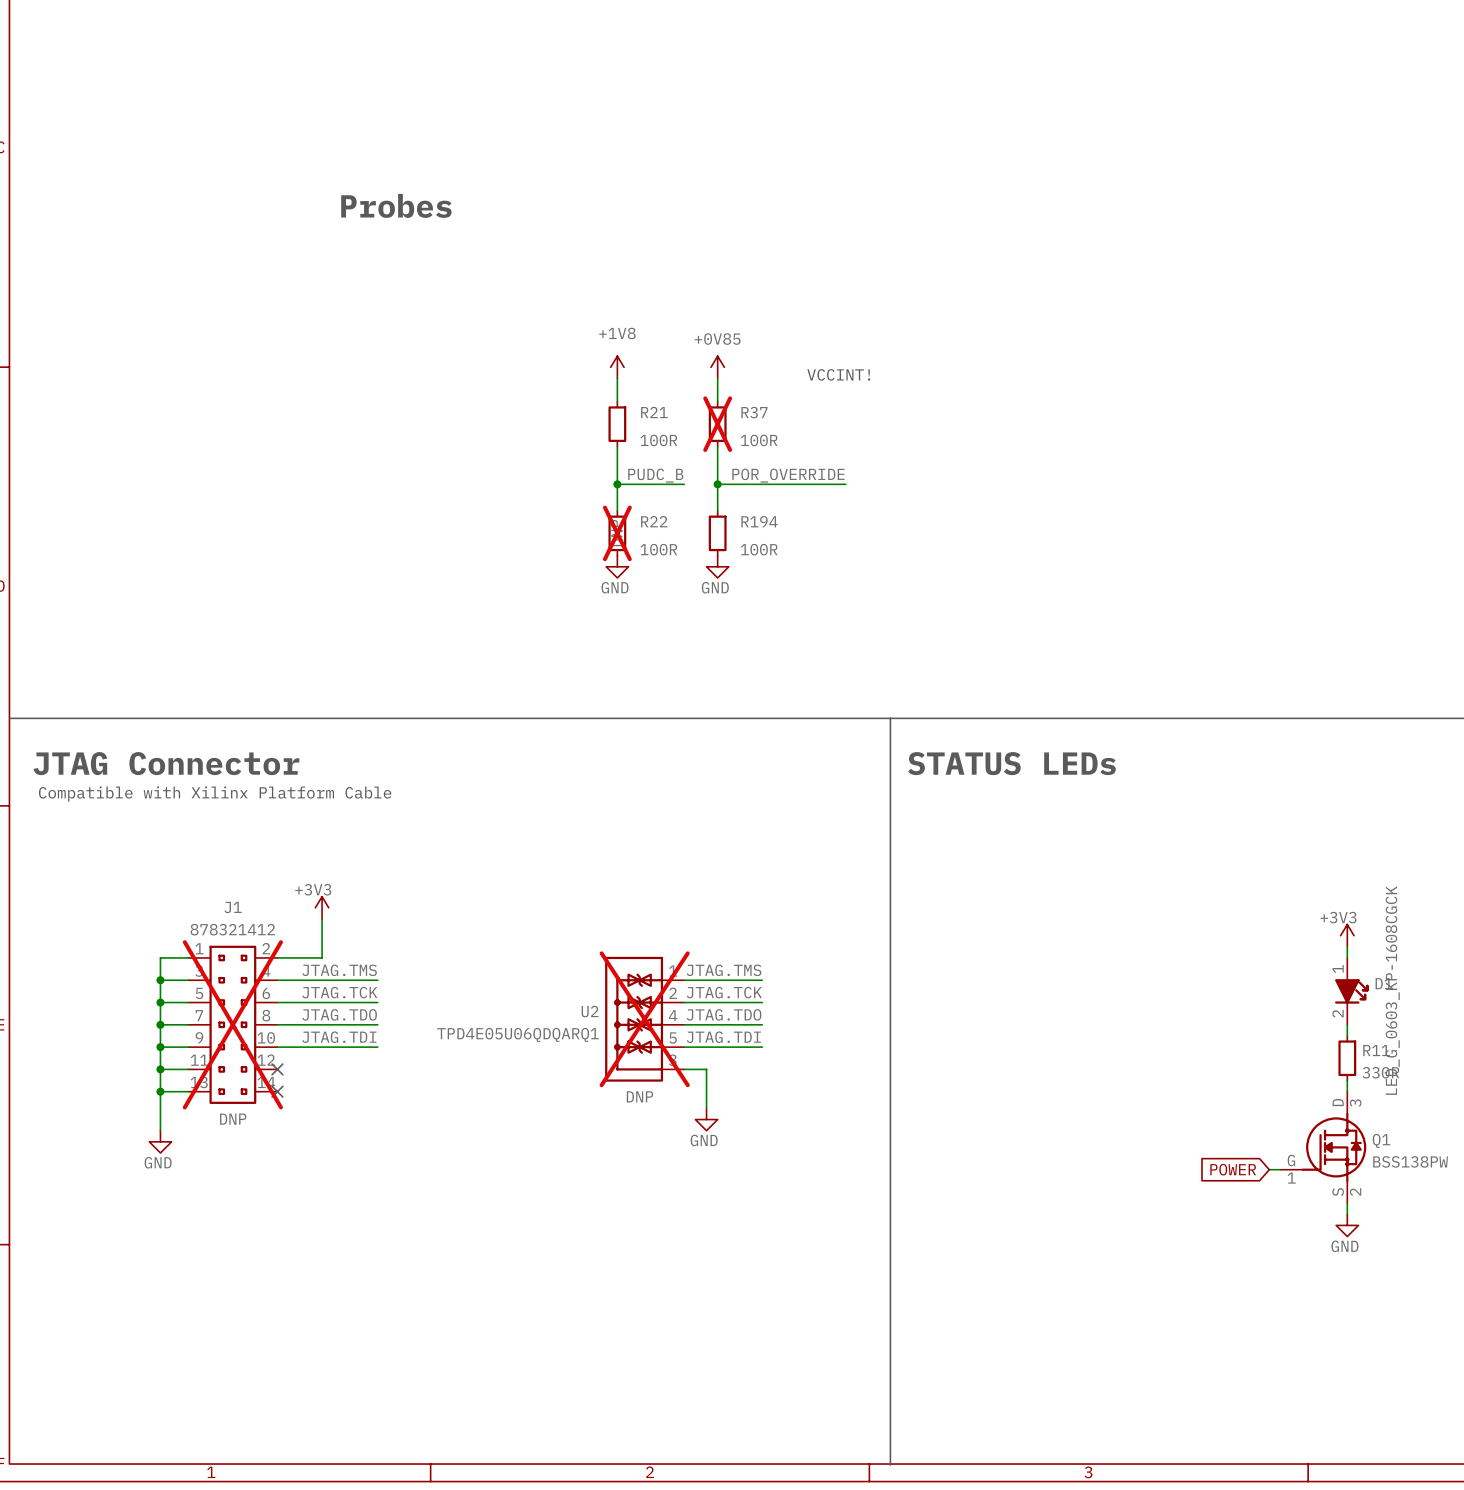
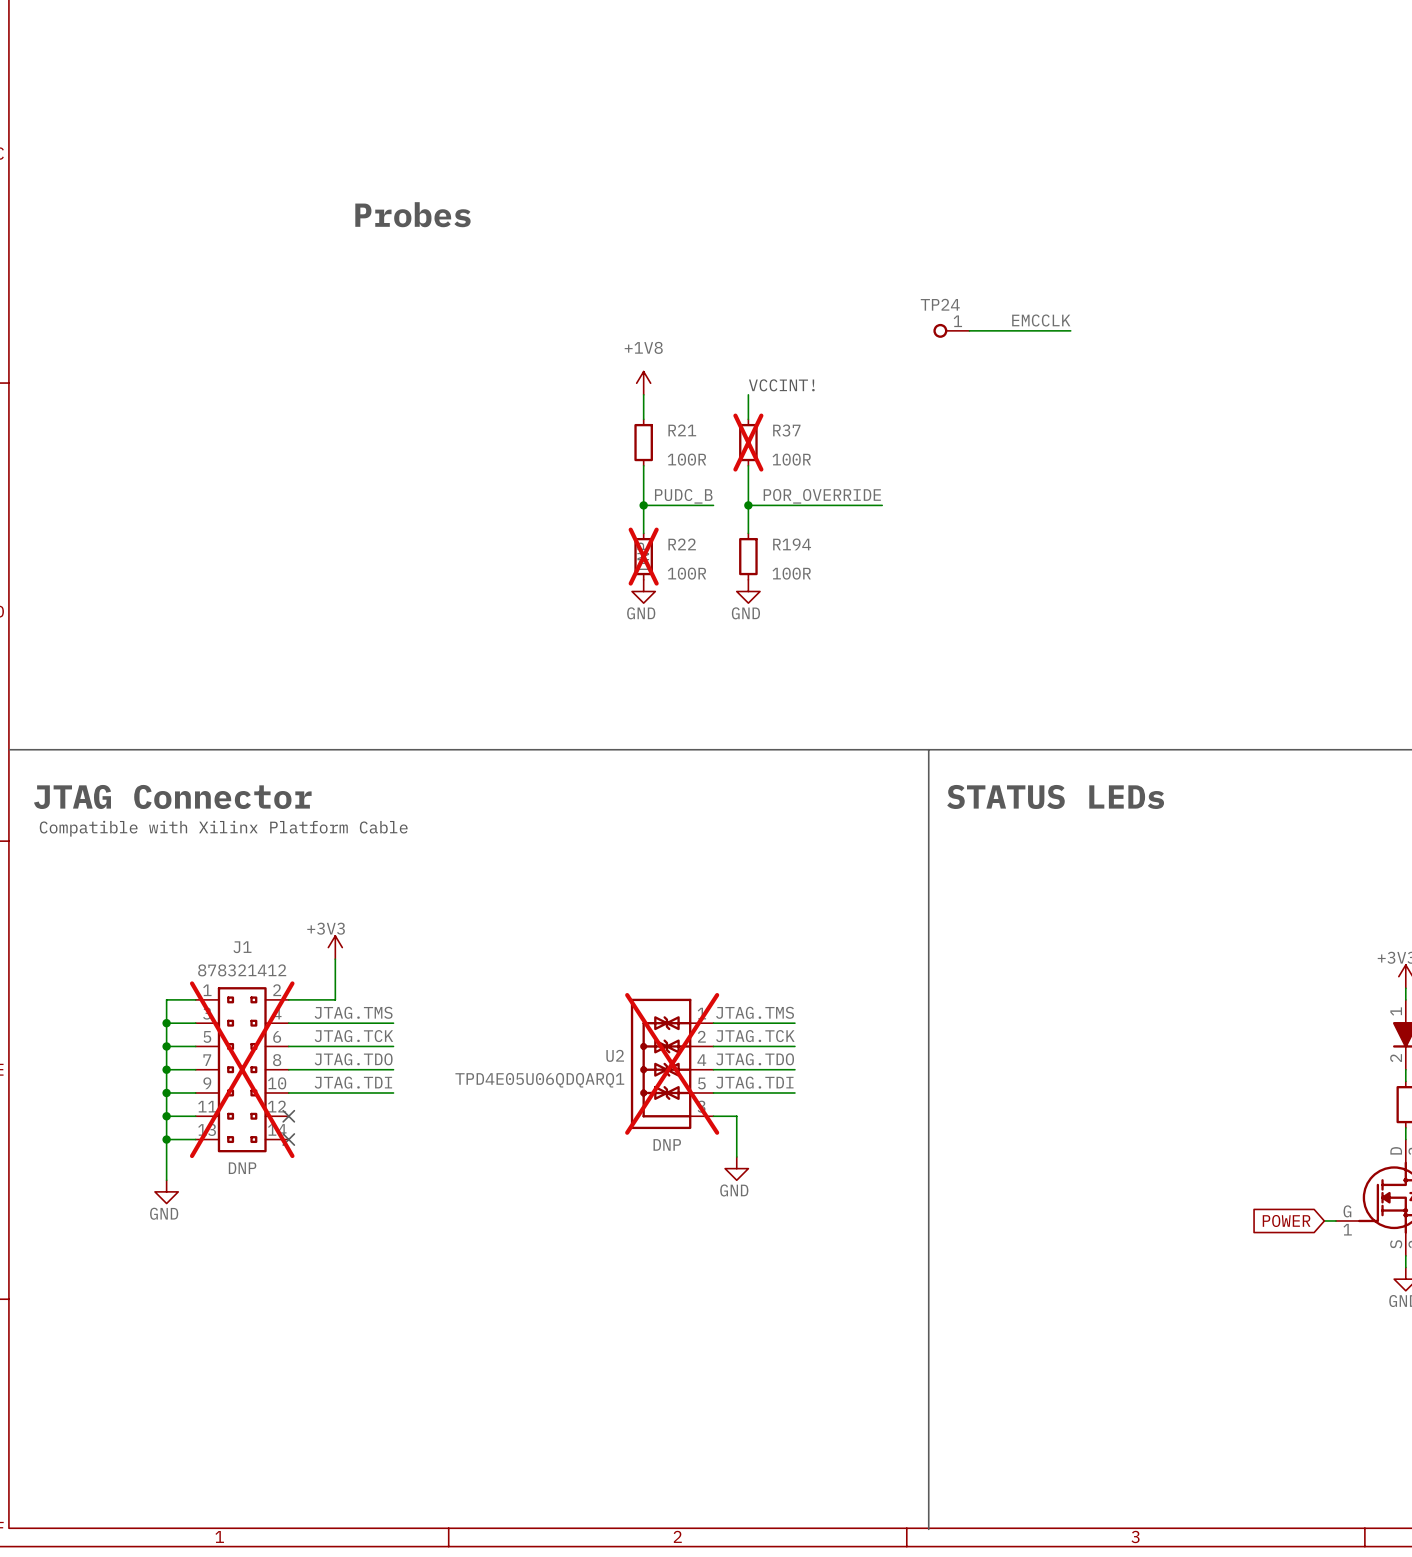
label: none -> EMCCLK (1041, 320)
TP24: none -> (951, 330)
wire: none -> (969, 330) (1070, 330)
power symbol: +0V85 (717, 367) -> none
text position: VCCINT! (838, 374) -> VCCINT! (781, 385)

